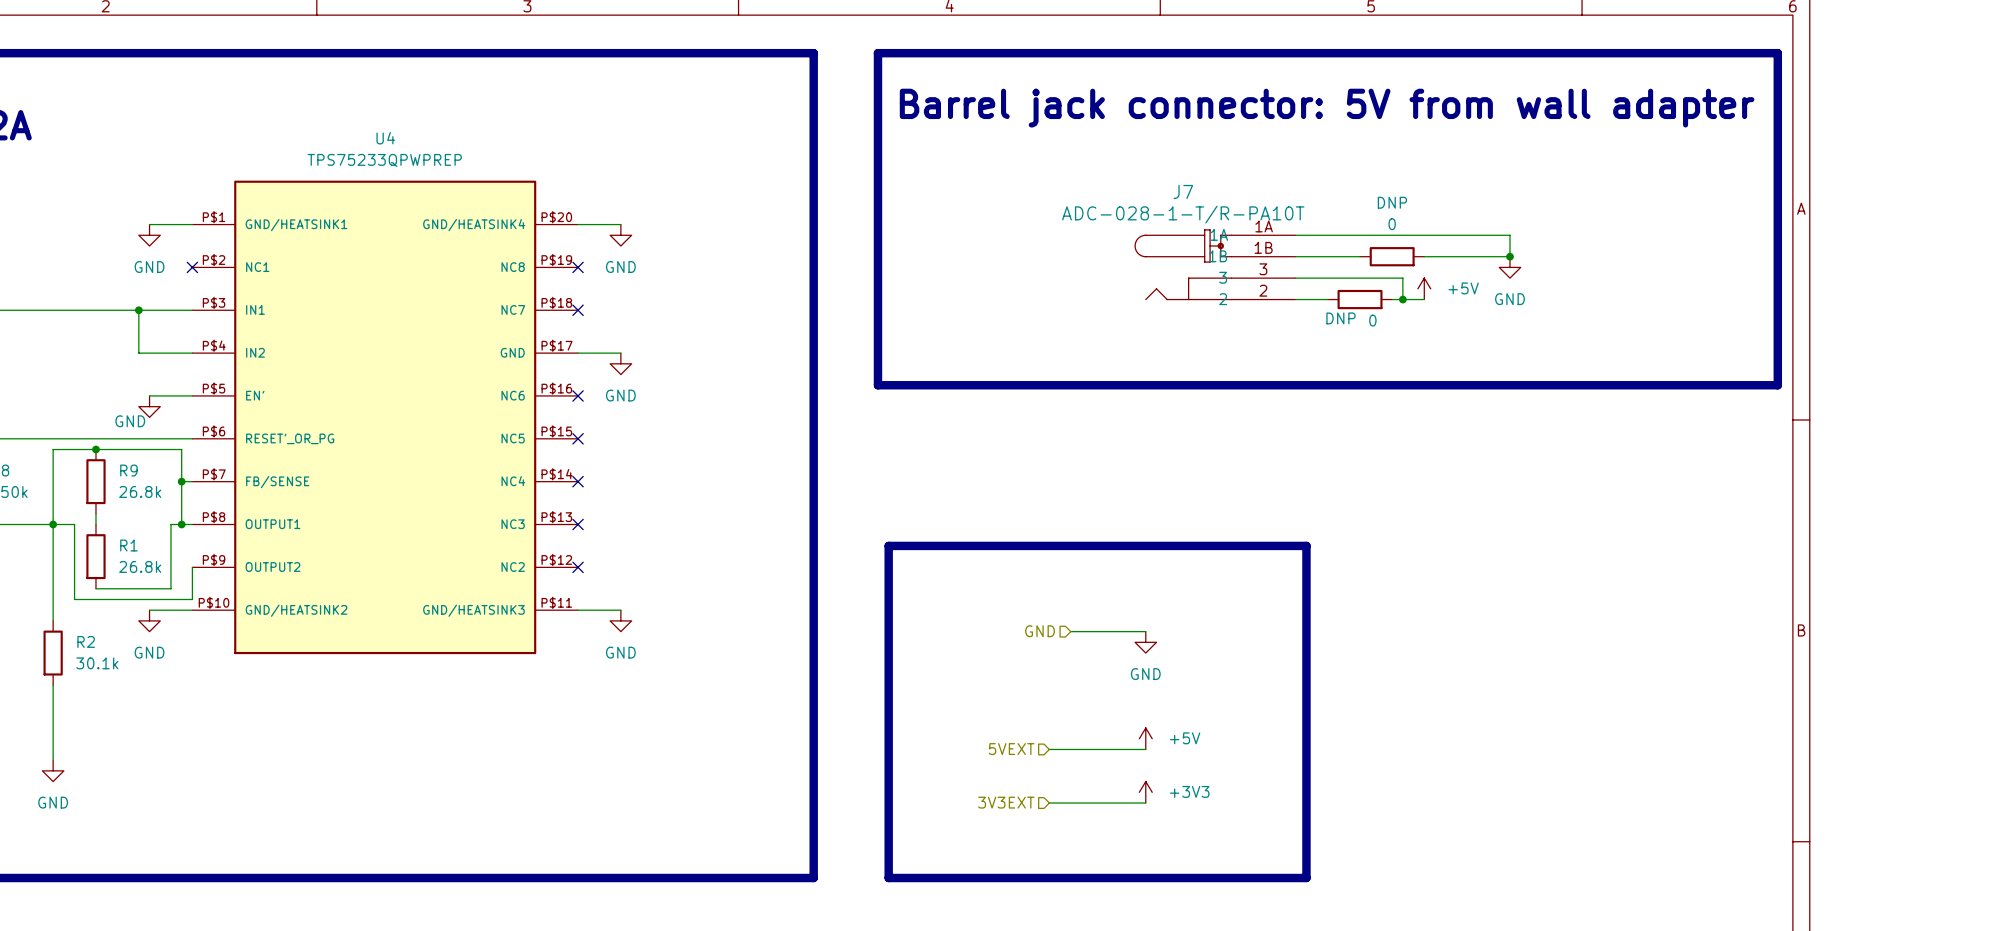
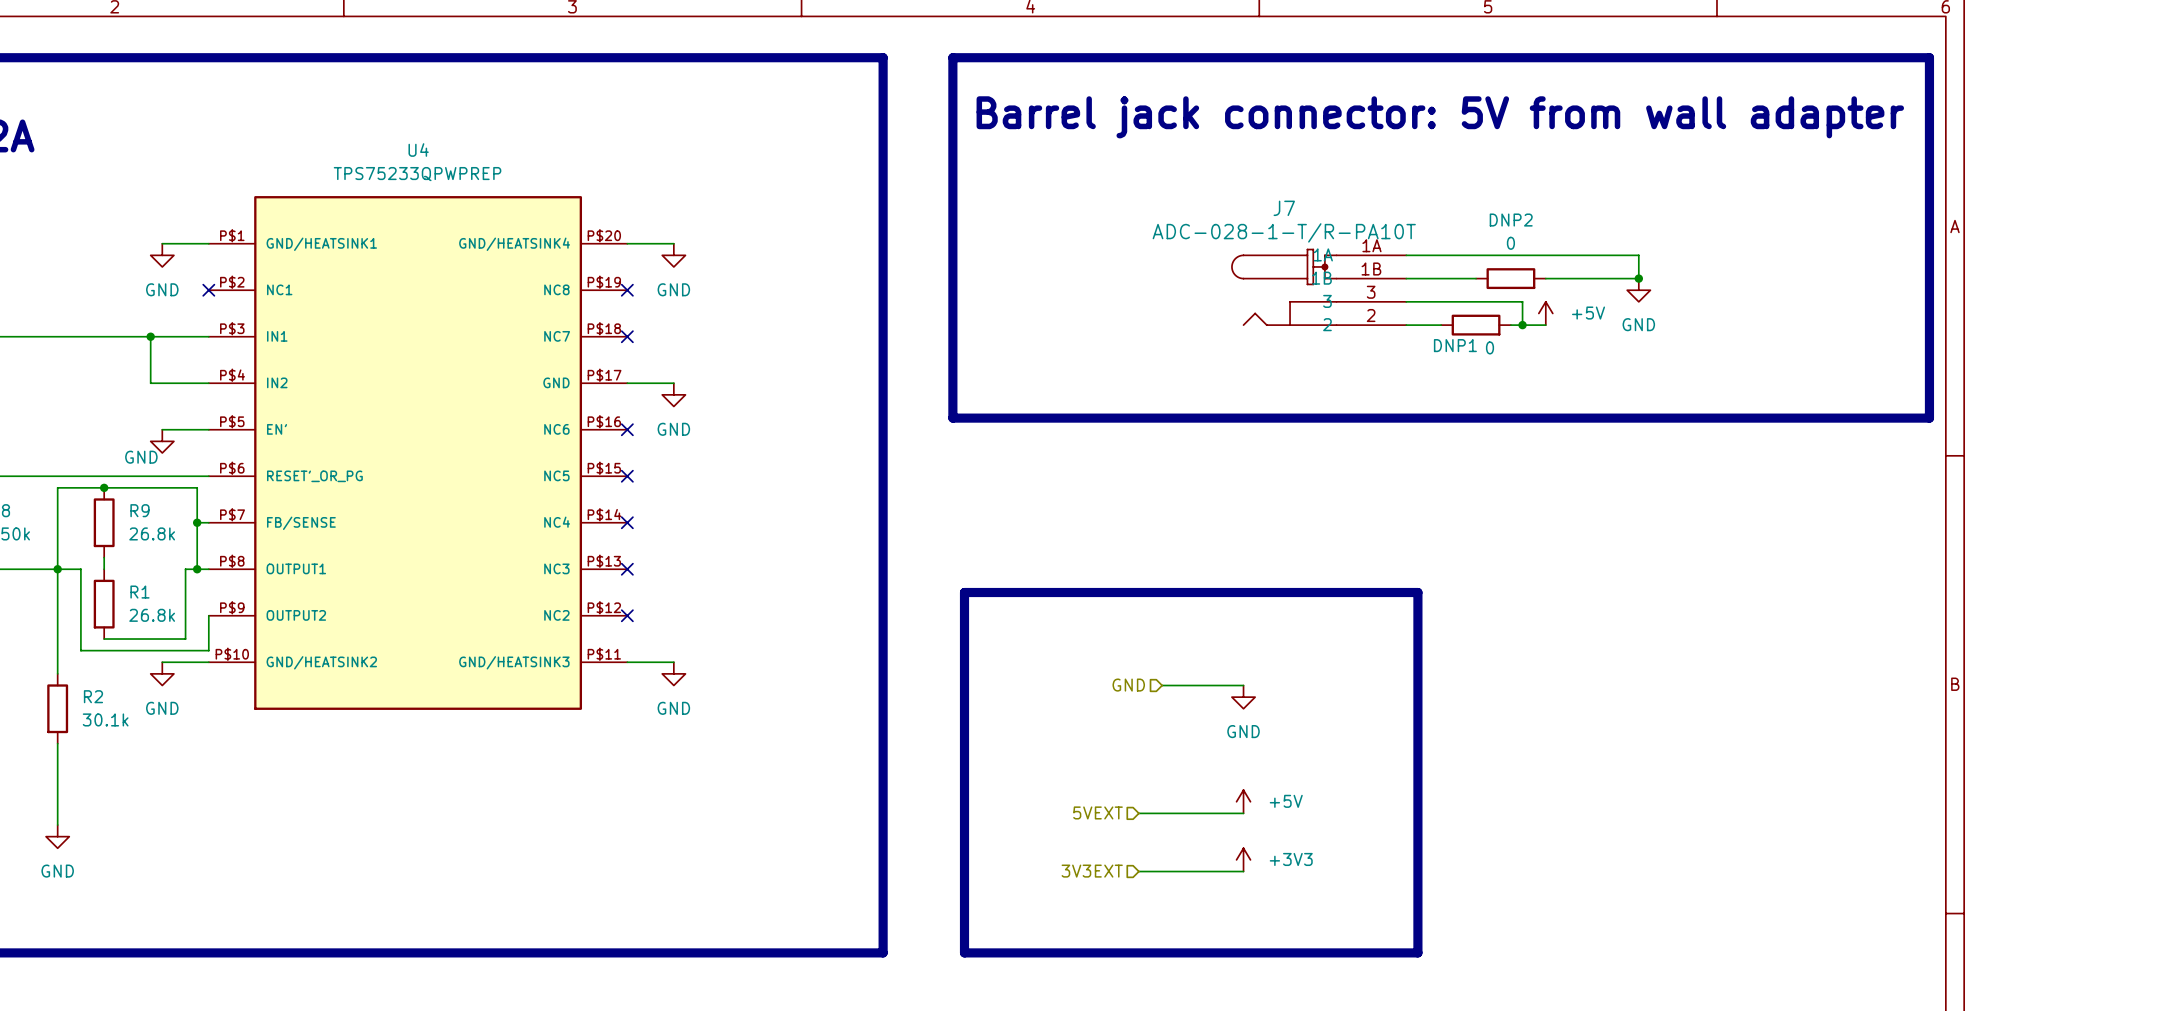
DNP name: DNP (1392, 202) -> DNP2 (1511, 220)
DNP name: DNP (1341, 318) -> DNP1 (1455, 345)

